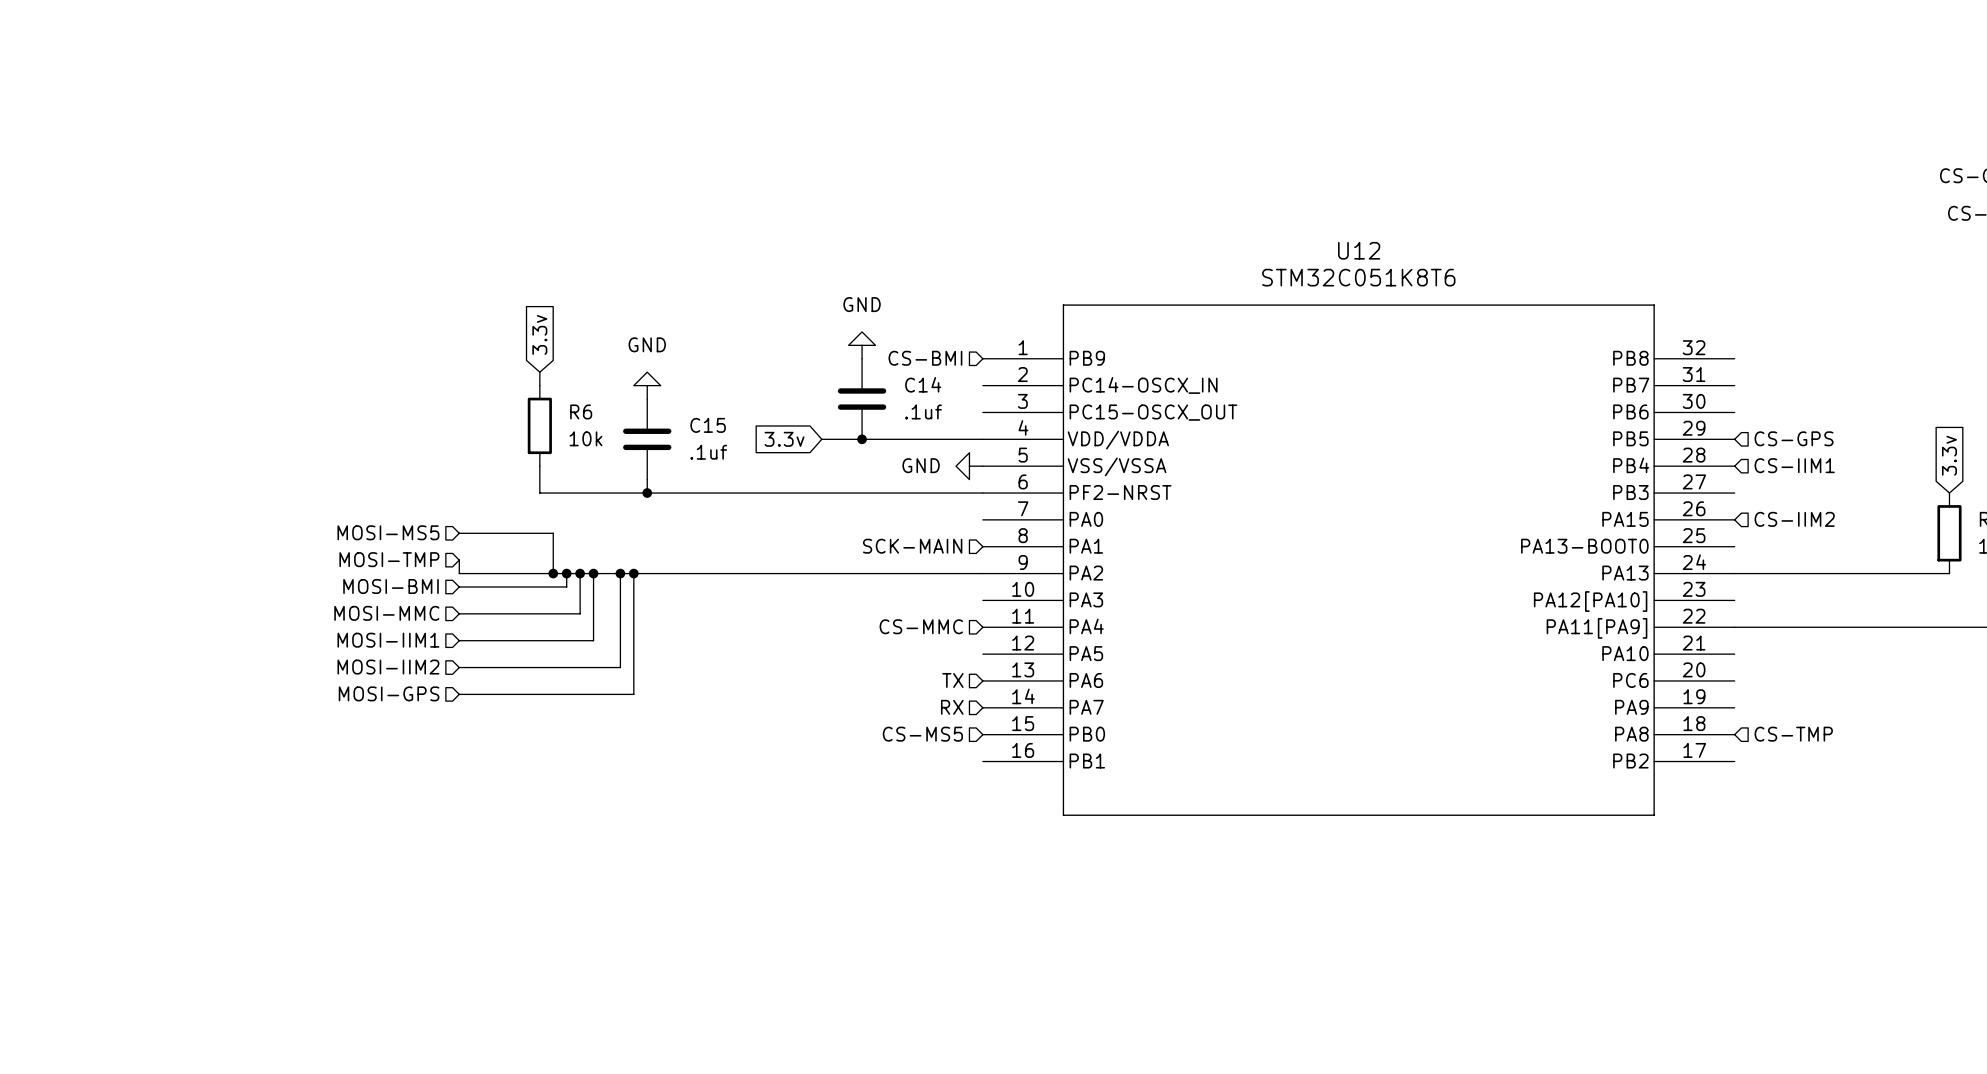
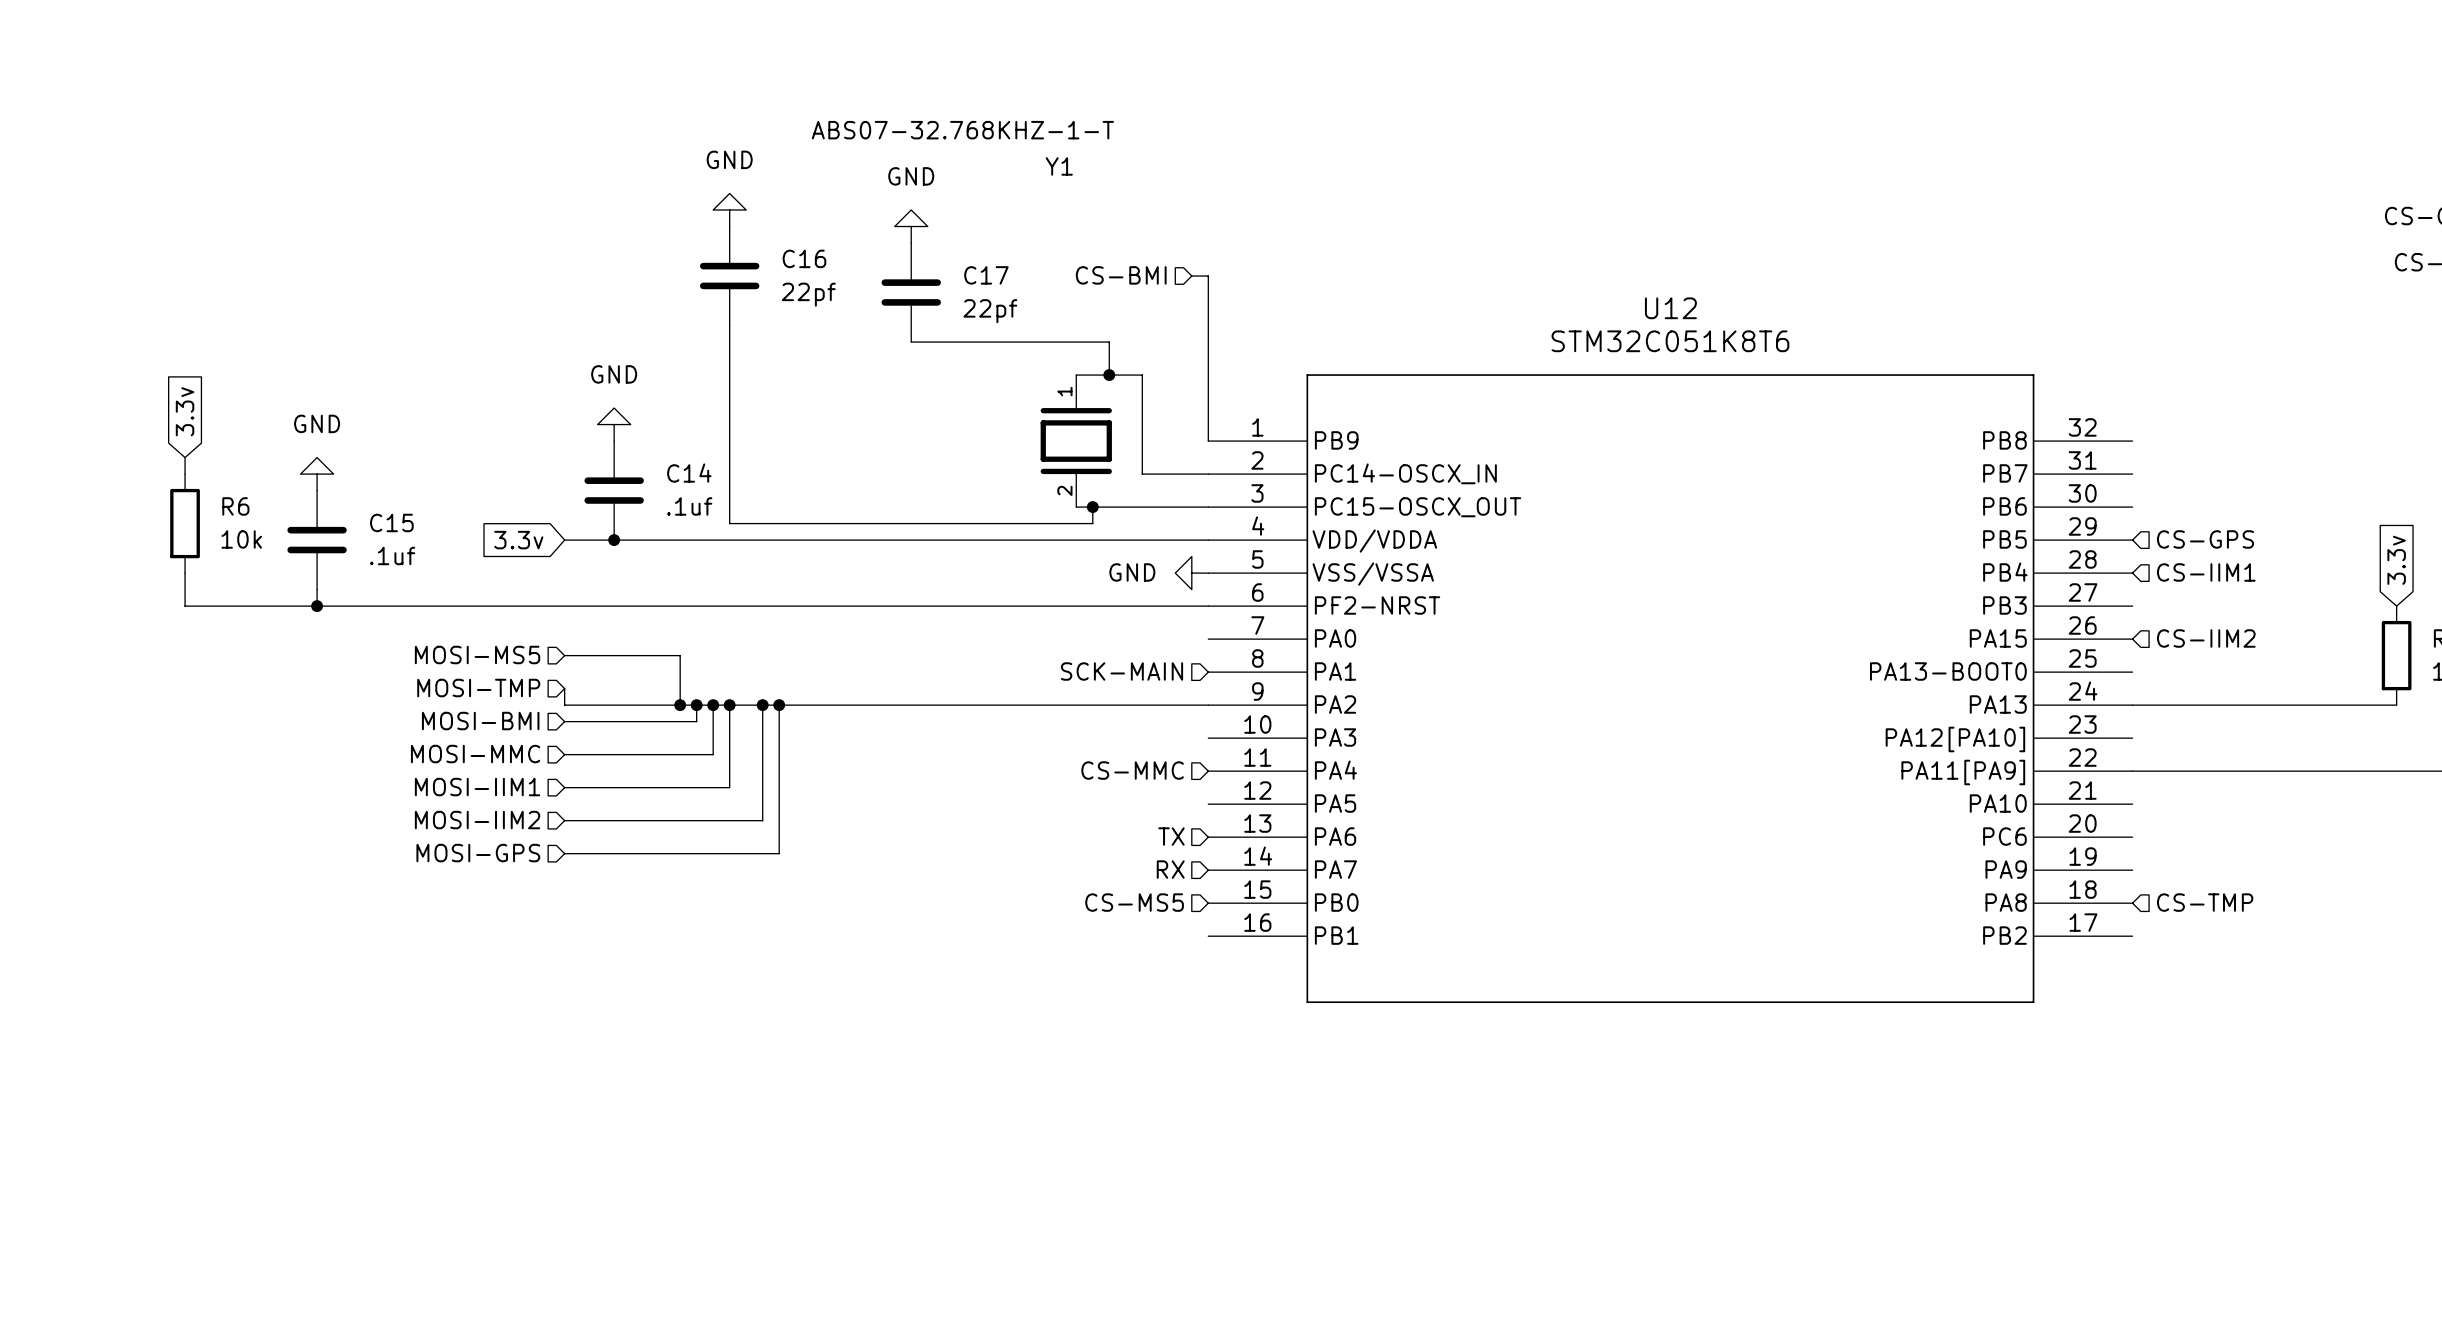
power symbol: none -> GND (729, 210)
power symbol: none -> GND (911, 226)
C16: none -> 22pf (729, 276)
wire: none -> (1191, 276) (1208, 276) (1208, 441)
C17: none -> 22pf (911, 292)
wire: none -> (729, 325) (729, 523) (1092, 523) (1092, 507)
wire: none -> (911, 342) (1109, 342) (1109, 375)
wire: none -> (1076, 375) (1142, 375) (1142, 474) (1208, 474)
junction: none -> (1109, 375)
global label: none -> 3.3v (185, 411)
global label rotation: 0° (539, 334) -> 90° counterclockwise (518, 540)
global label position: 3.3v (539, 334) -> 3.3v (518, 540)
power symbol: none -> GND (614, 424)
power symbol: GND (862, 345) -> none
Y1: none -> ABS07-32.768KHZ-1-T (1076, 441)
hierarchical label position: CS-BMI (925, 358) -> CS-BMI (1121, 275)
wire: none -> (185, 457) (185, 474)
wire: (539, 372) (539, 385) -> none
power symbol: none -> GND (317, 474)
power symbol: GND (647, 385) -> none
C14 position: (862, 399) -> (614, 490)
wire: none -> (1076, 507) (1208, 507)
R6 position: (539, 425) -> (185, 523)
wire: none -> (564, 540) (1010, 540)
junction: none -> (614, 540)
C15 position: (647, 439) -> (317, 540)
global label: 3.3v (784, 439) -> none
junction position: (862, 439) -> (1092, 507)
wire: (539, 466) (539, 493) -> (185, 573) (185, 606) (663, 606)
wire: none -> (317, 589) (317, 606)
wire: (647, 479) (647, 493) -> none
junction: none -> (317, 606)
junction: (647, 493) -> none

